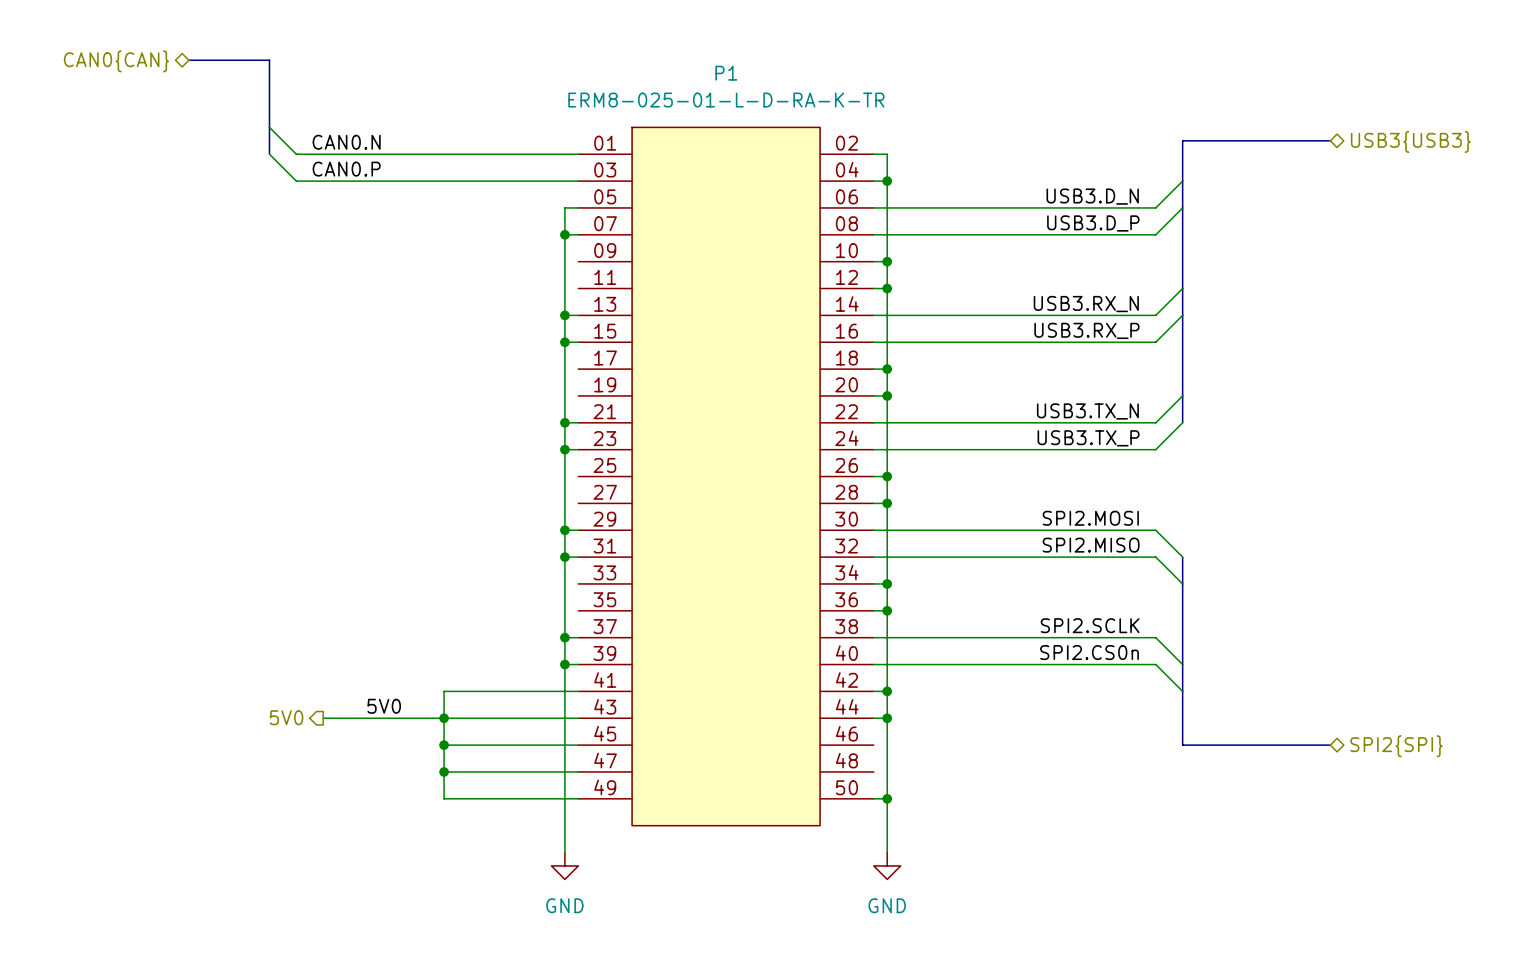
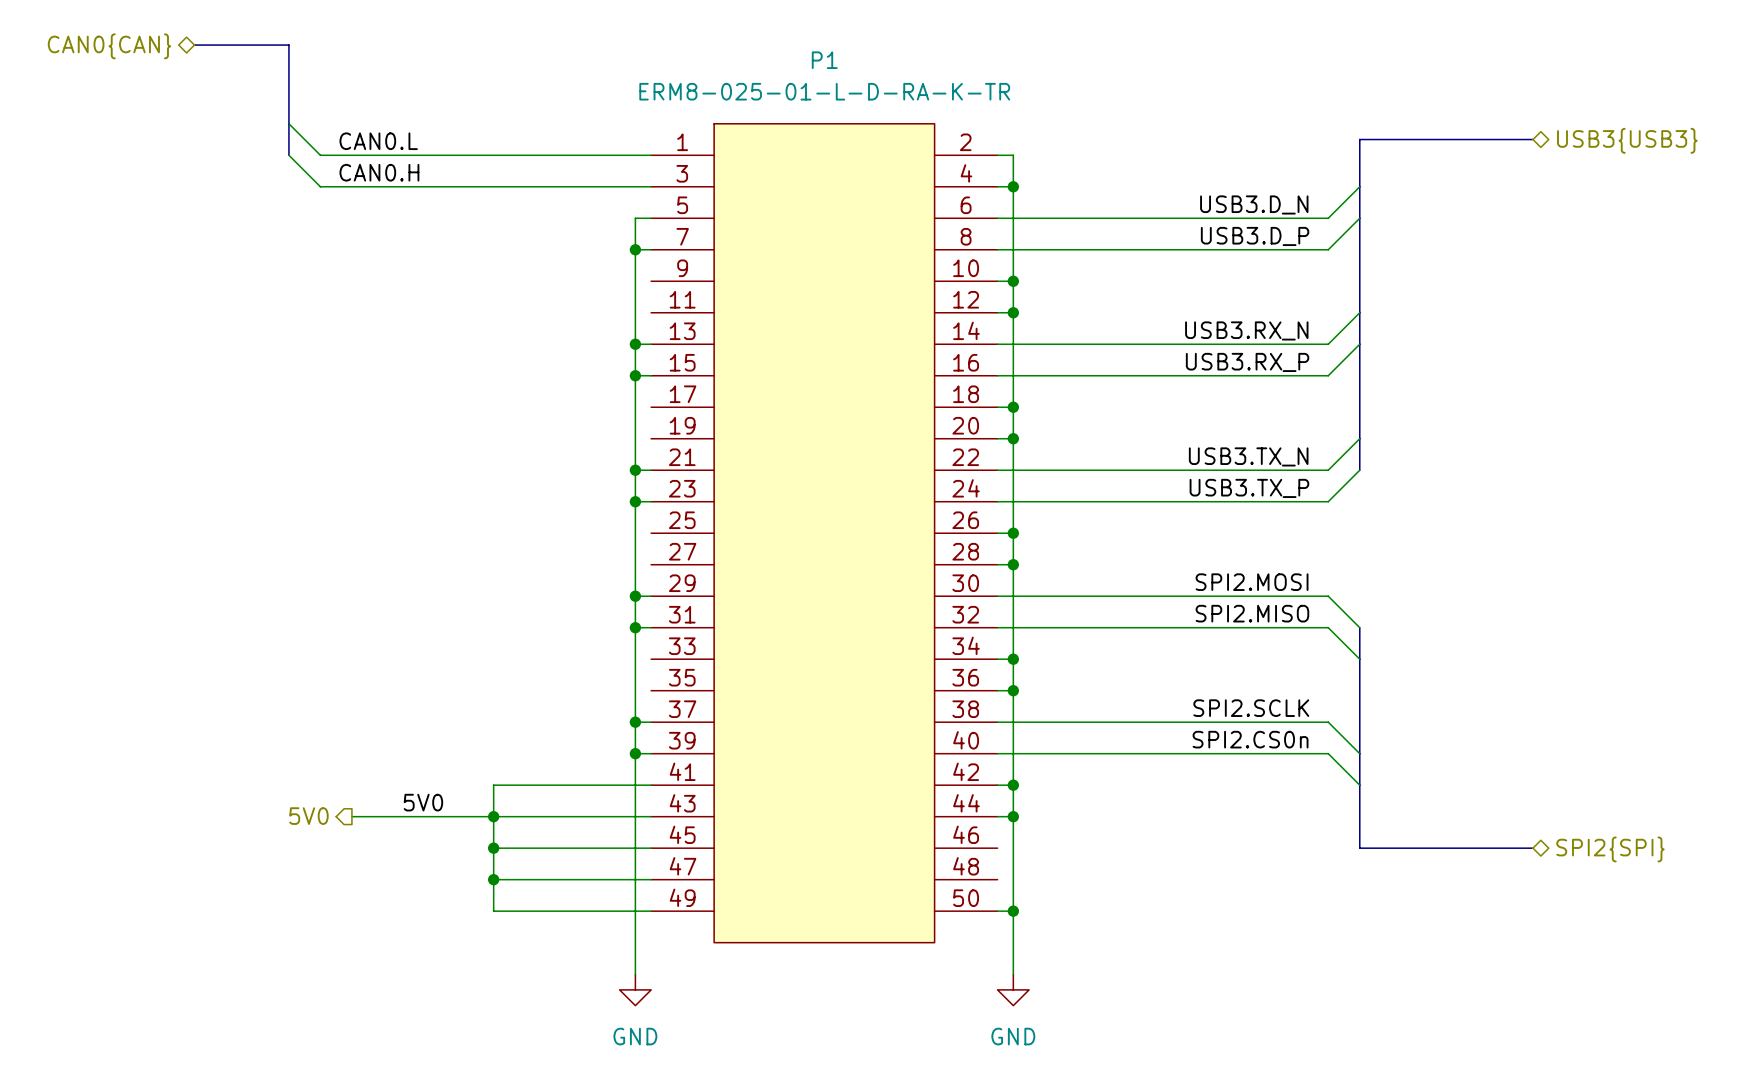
P1 symbol: [578, 127, 874, 826] -> [651, 123, 998, 943]
label: CAN0.N (346, 142) -> CAN0.L (378, 141)
label: CAN0.P (346, 169) -> CAN0.H (379, 172)

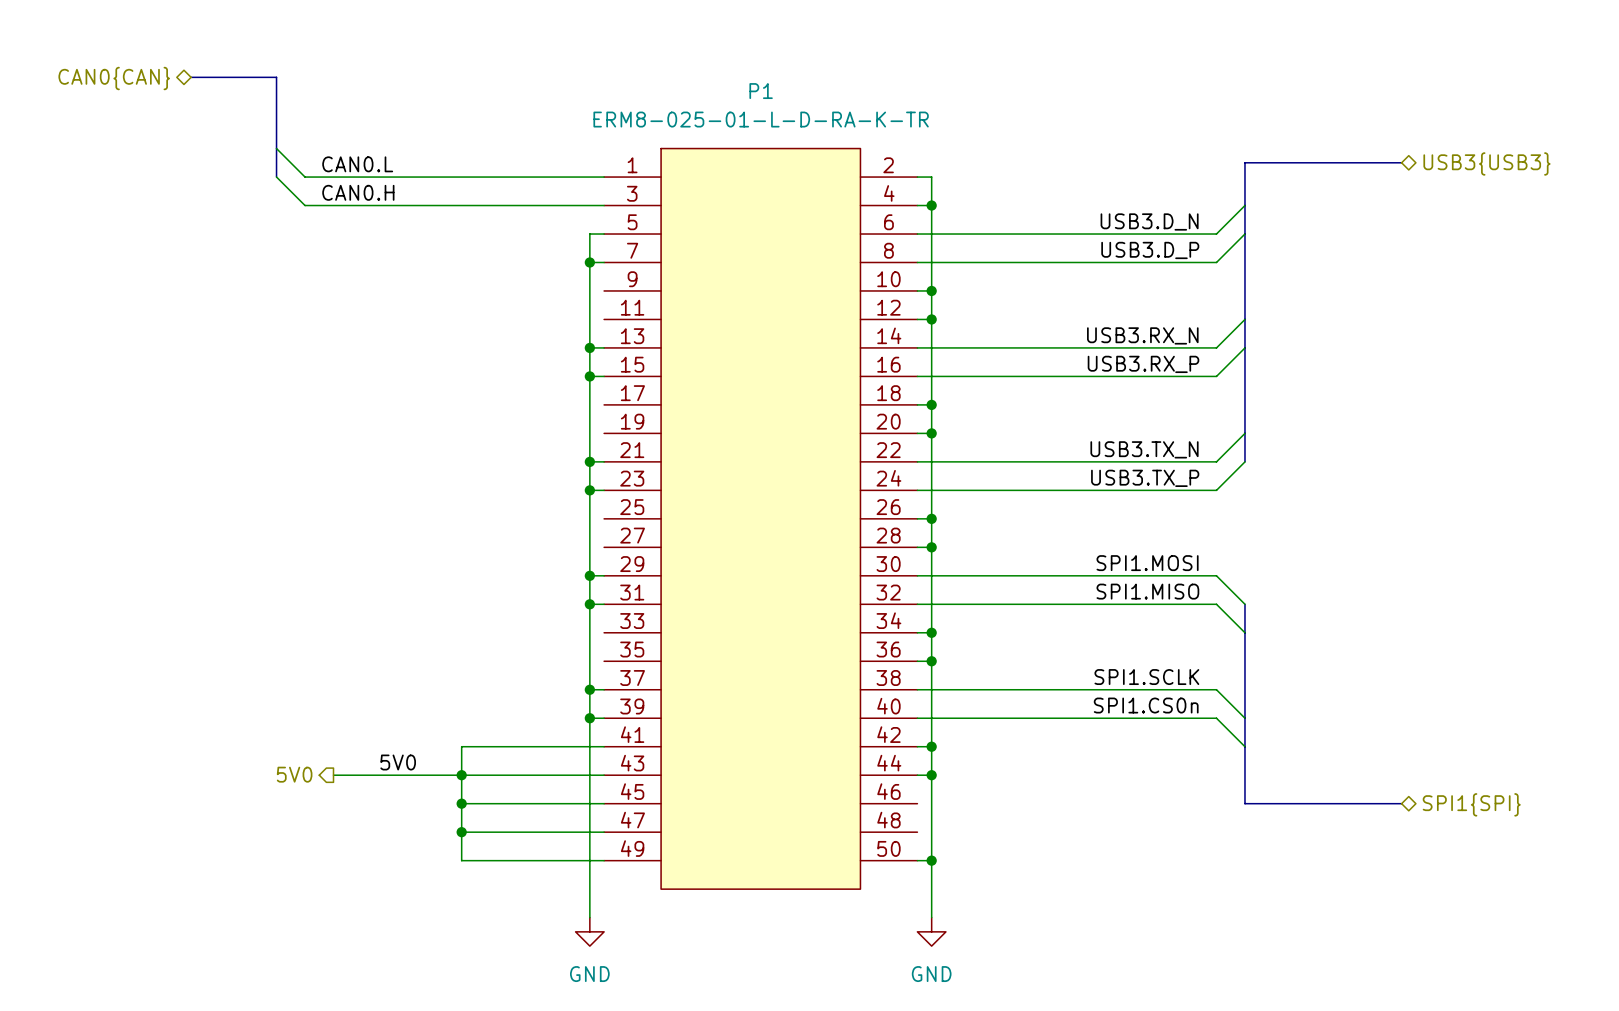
label: SPI2.MOSI (1252, 582) -> SPI1.MOSI (1147, 563)
label: SPI2.MISO (1252, 613) -> SPI1.MISO (1147, 591)
label: SPI2.SCLK (1251, 708) -> SPI1.SCLK (1146, 677)
label: SPI2.CS0n (1250, 739) -> SPI1.CS0n (1146, 705)
hierarchical label: SPI2{SPI} (1610, 849) -> SPI1{SPI} (1471, 804)

